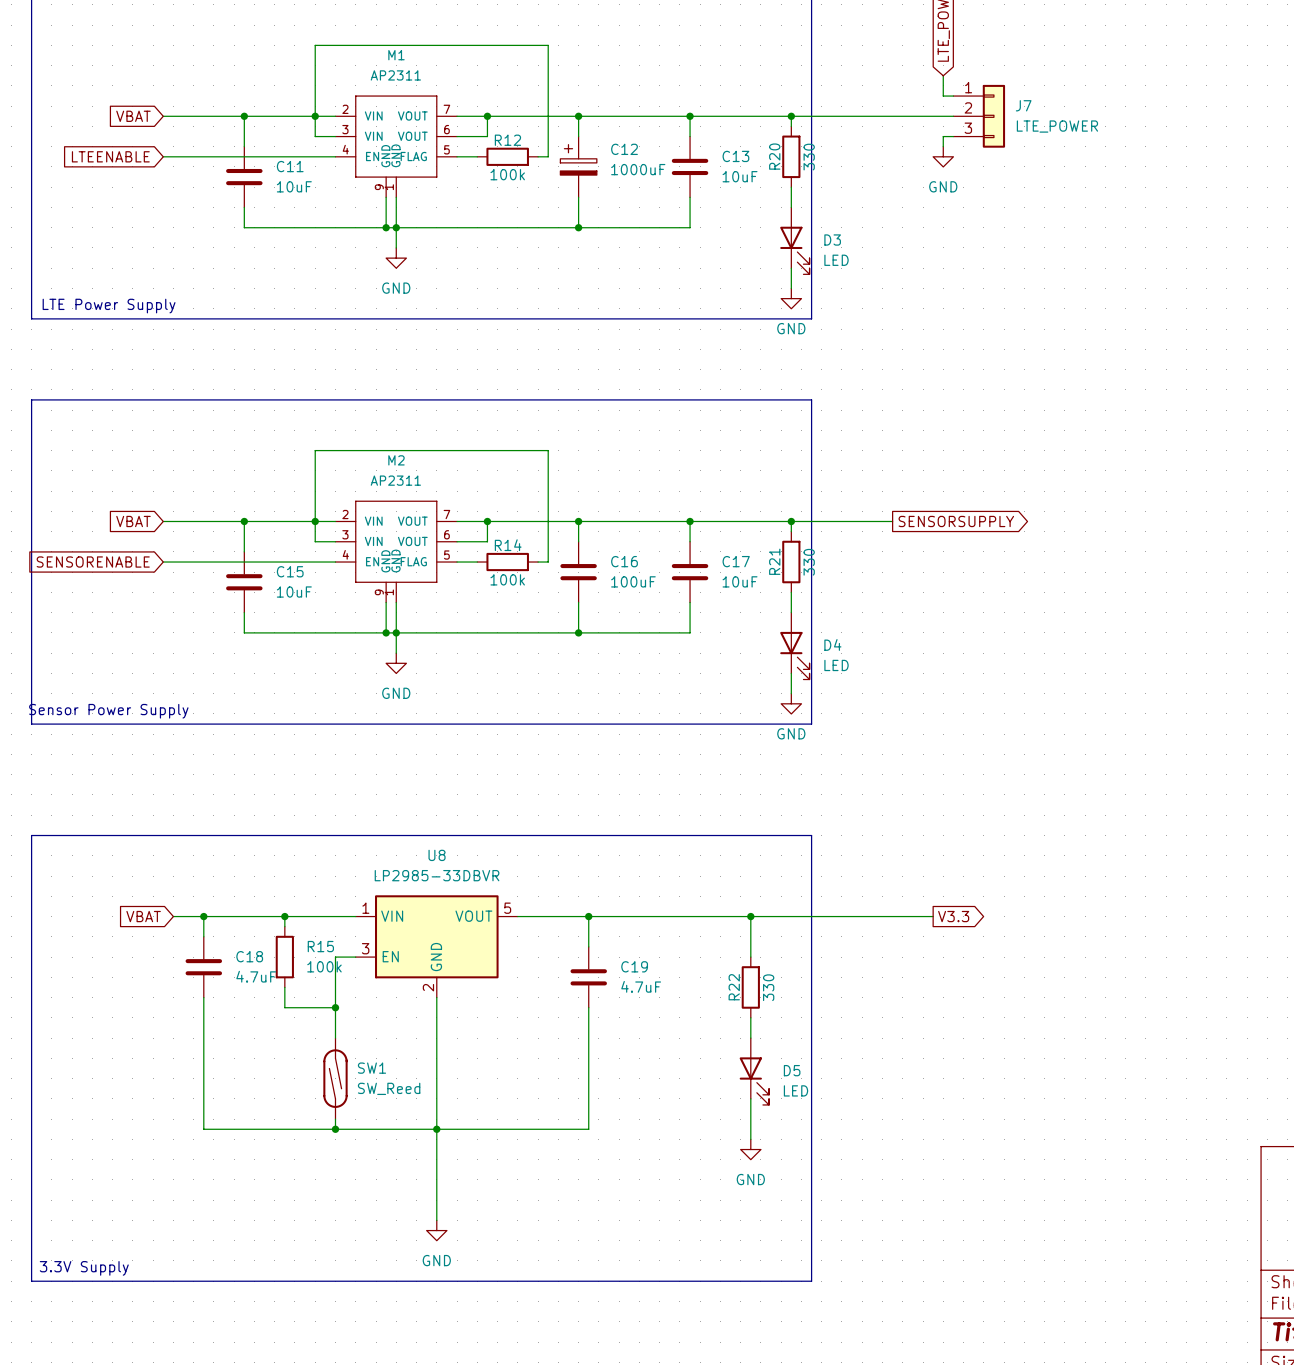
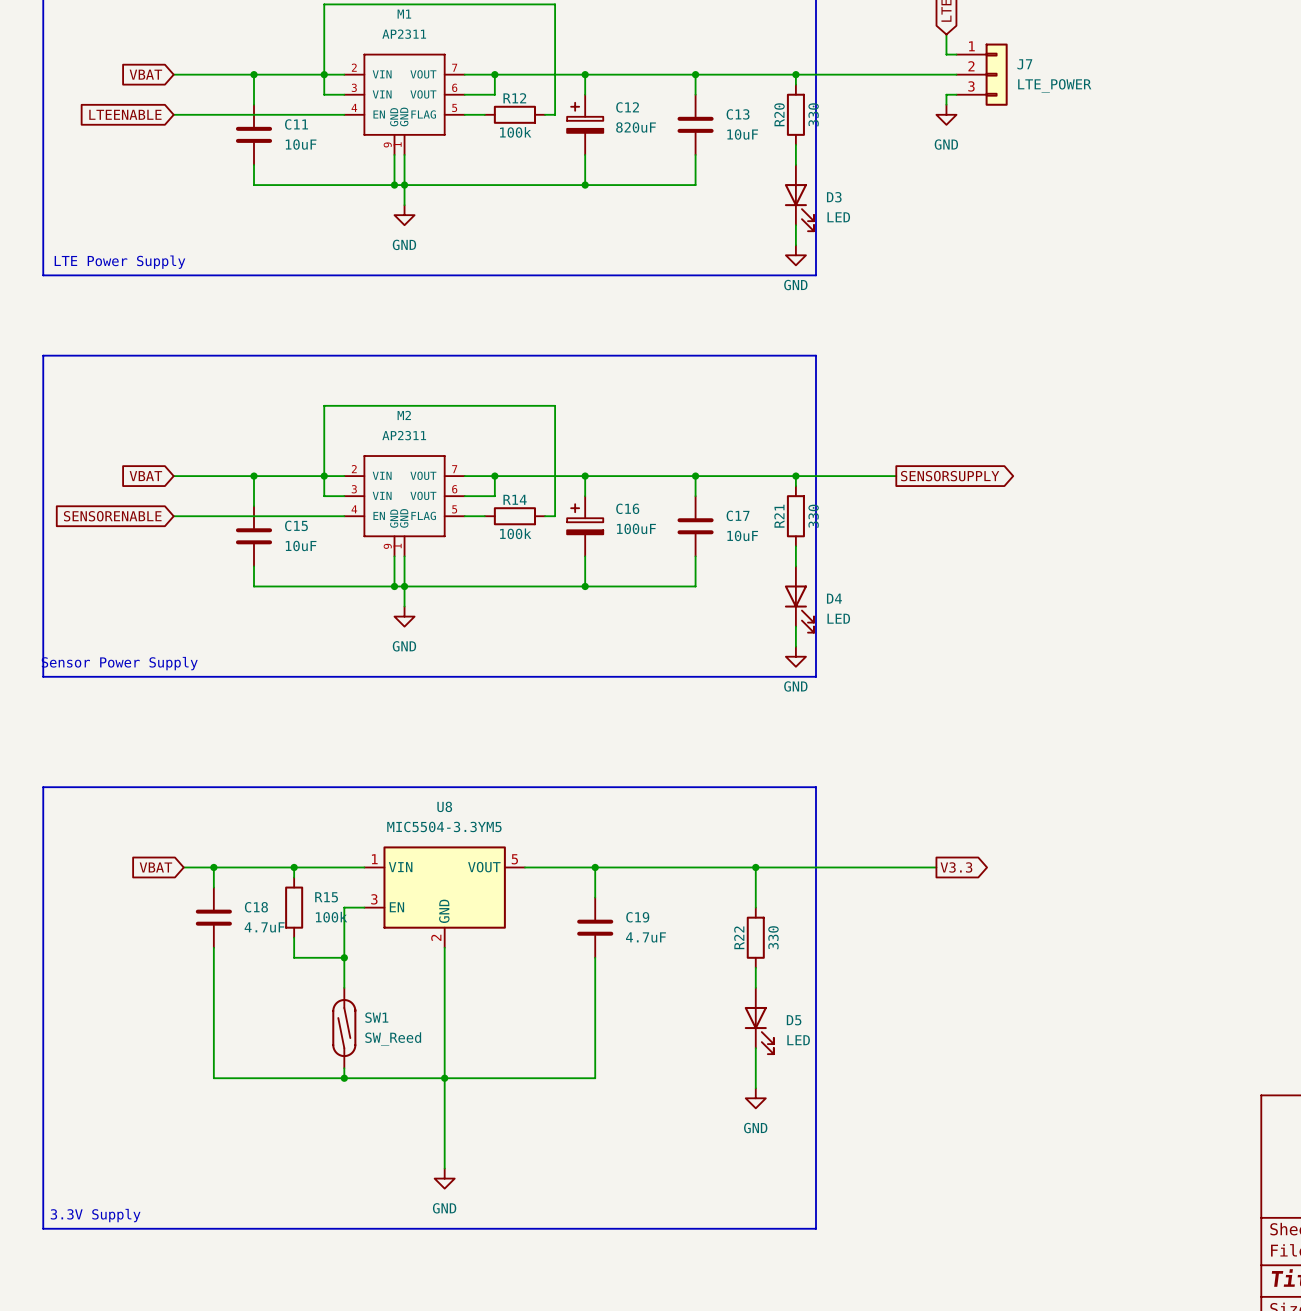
C12 value: 1000uF (638, 169) -> 820uF (636, 127)
C16 symbol: [560, 541, 597, 603] -> [567, 496, 604, 557]
U8 value: LP2985-33DBVR (437, 875) -> MIC5504-3.3YM5 (444, 826)

